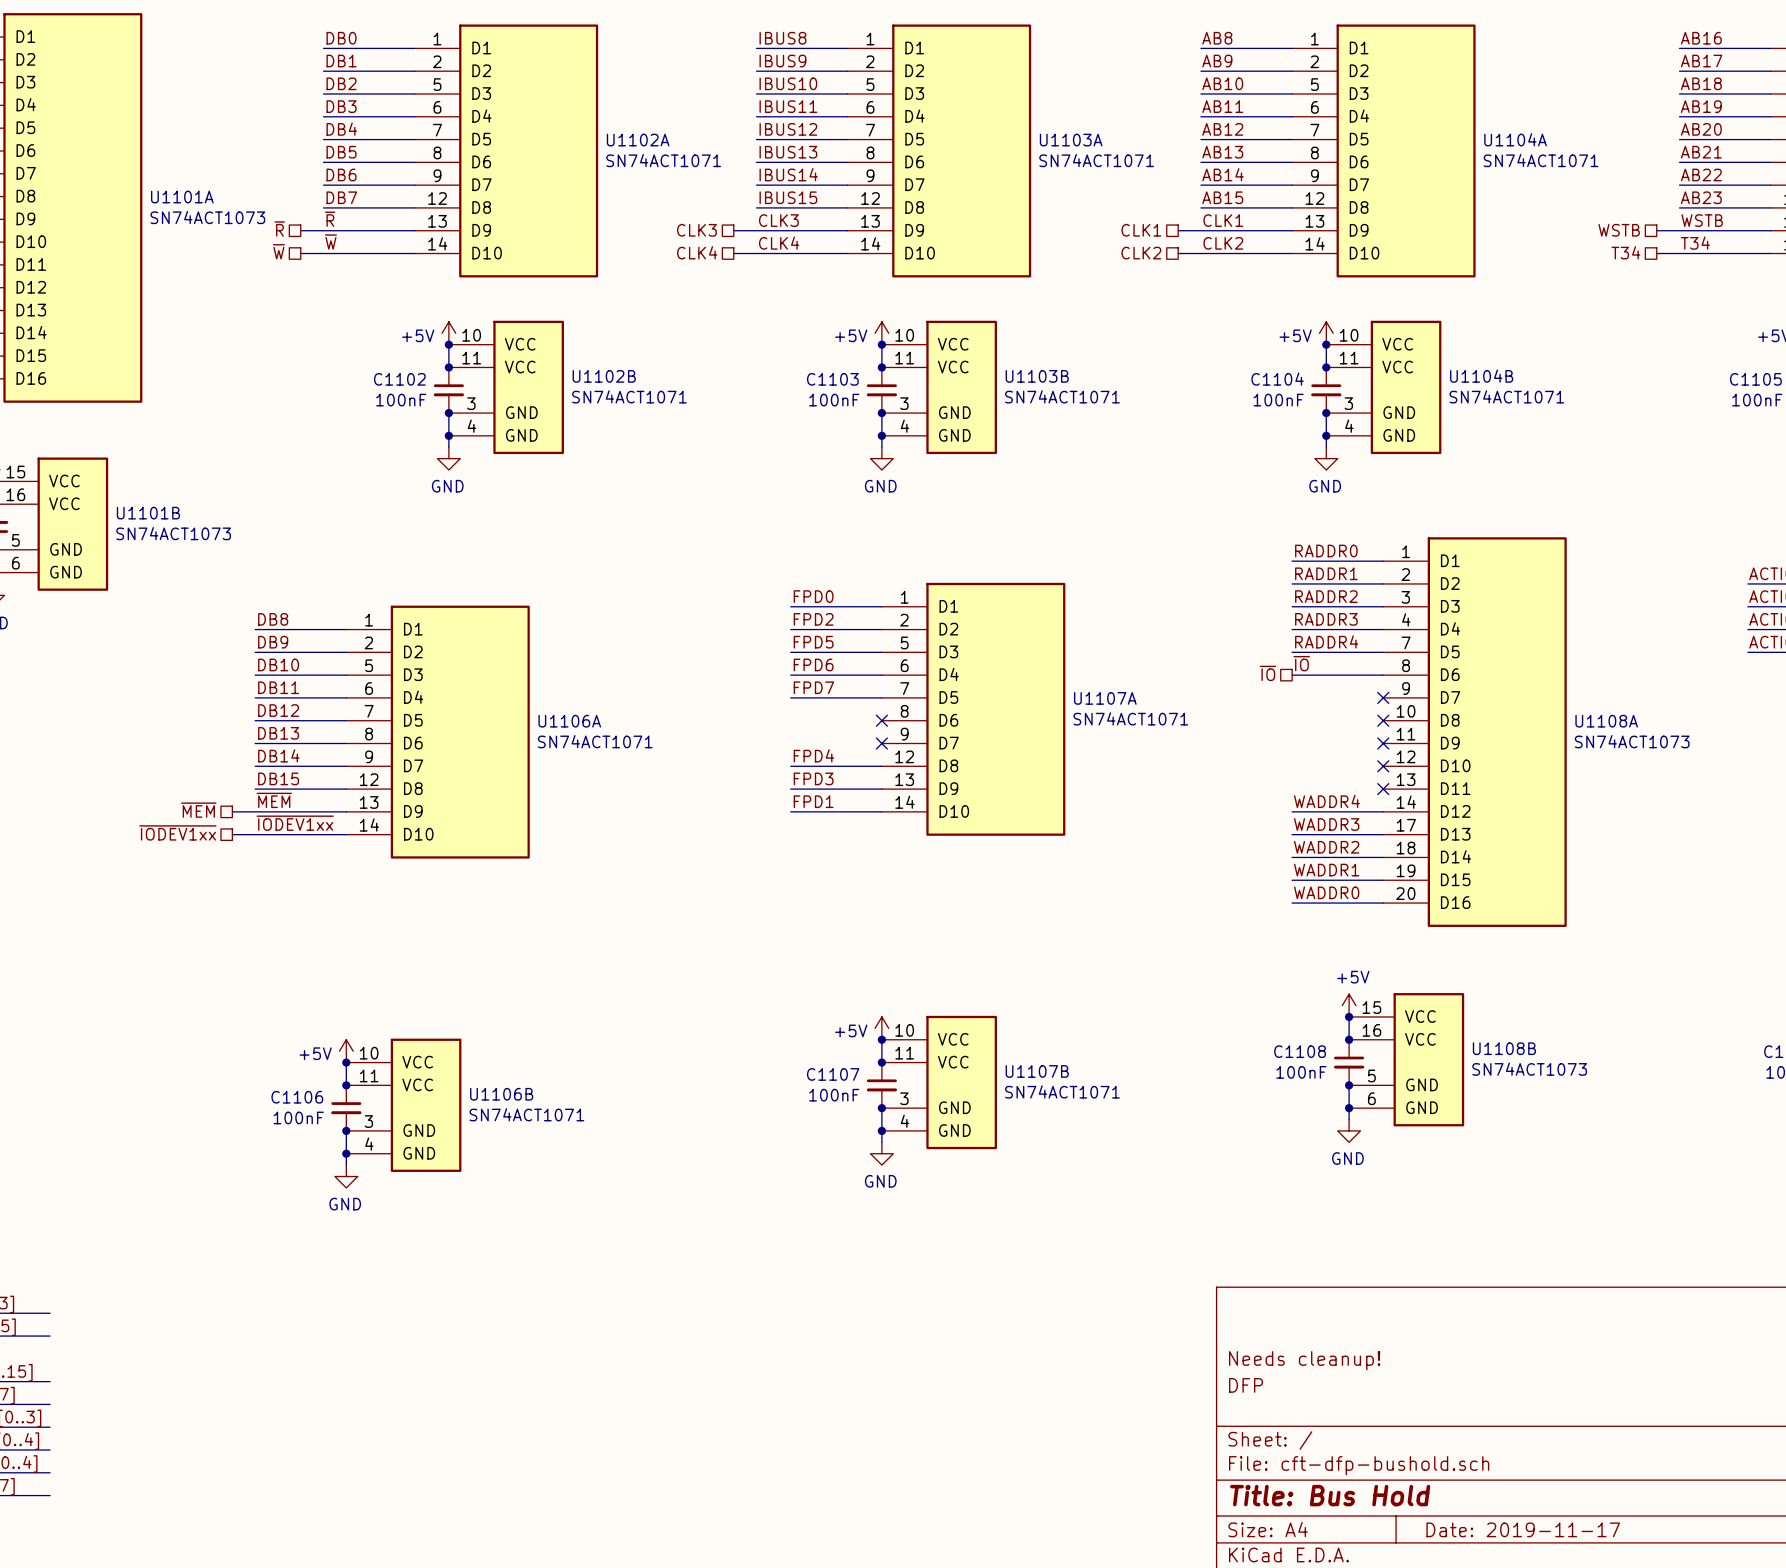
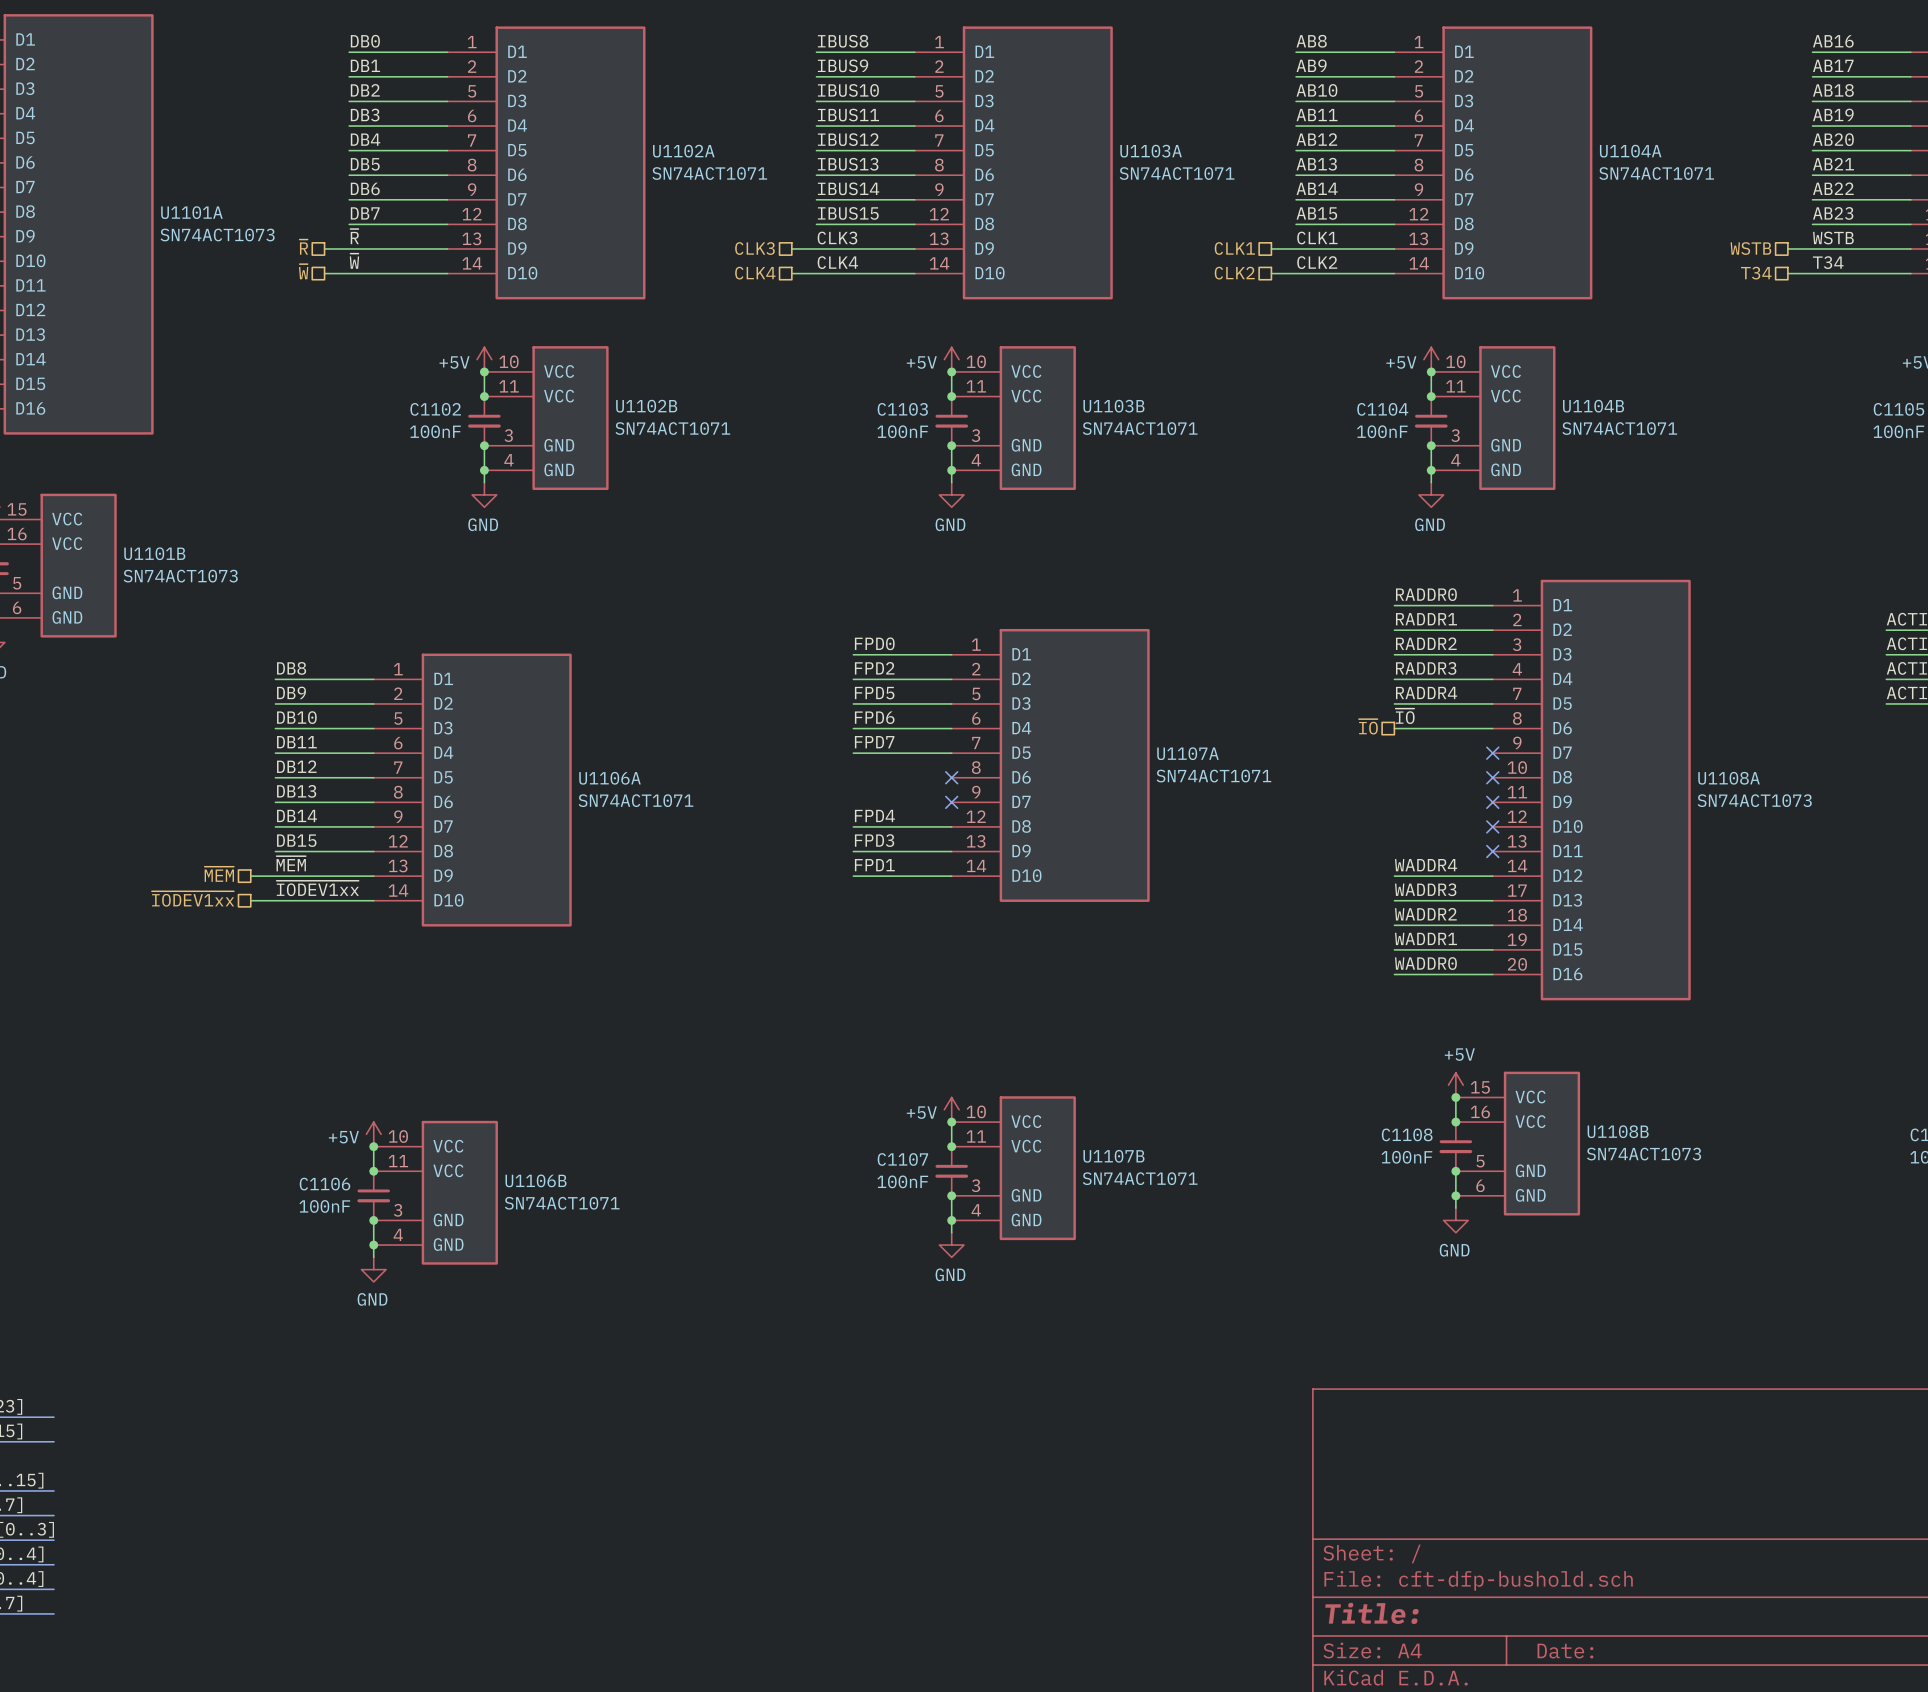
title block: Needs cleanup! (1304, 1360) -> none
title block: DFP (1246, 1385) -> none
title block: Title: Bus Hold (1330, 1495) -> Title: (1371, 1613)
title block: Date: 2019-11-17 (1523, 1529) -> Date: (1565, 1651)

